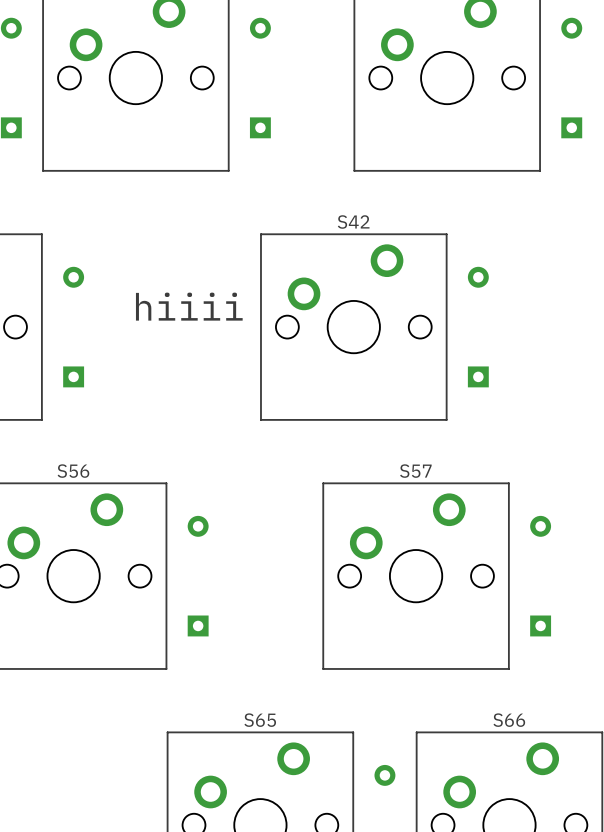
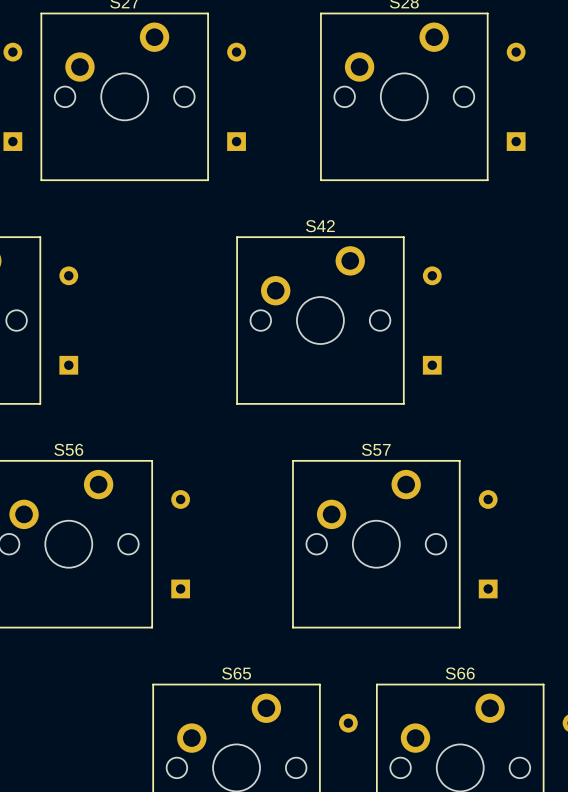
text: hiiii (189, 306) -> none

